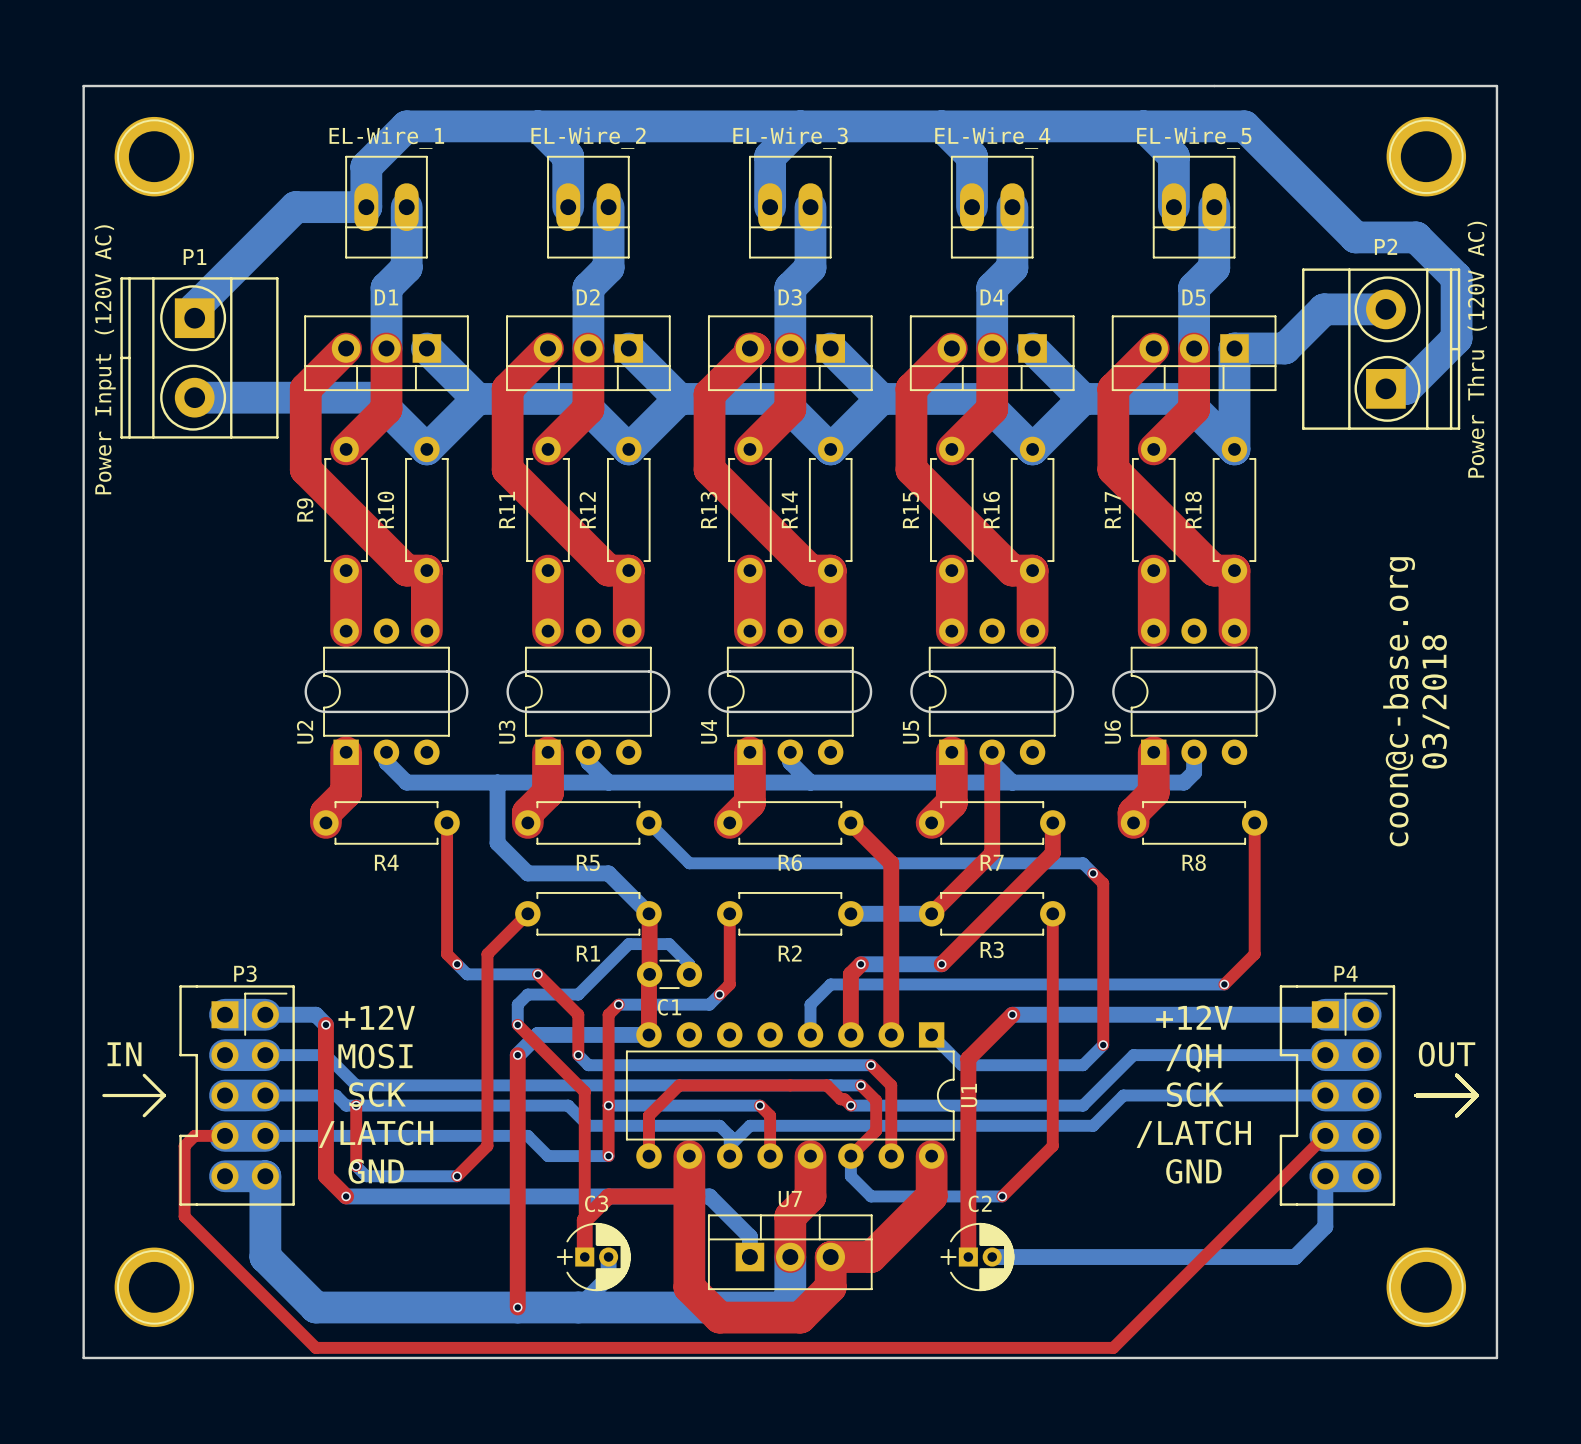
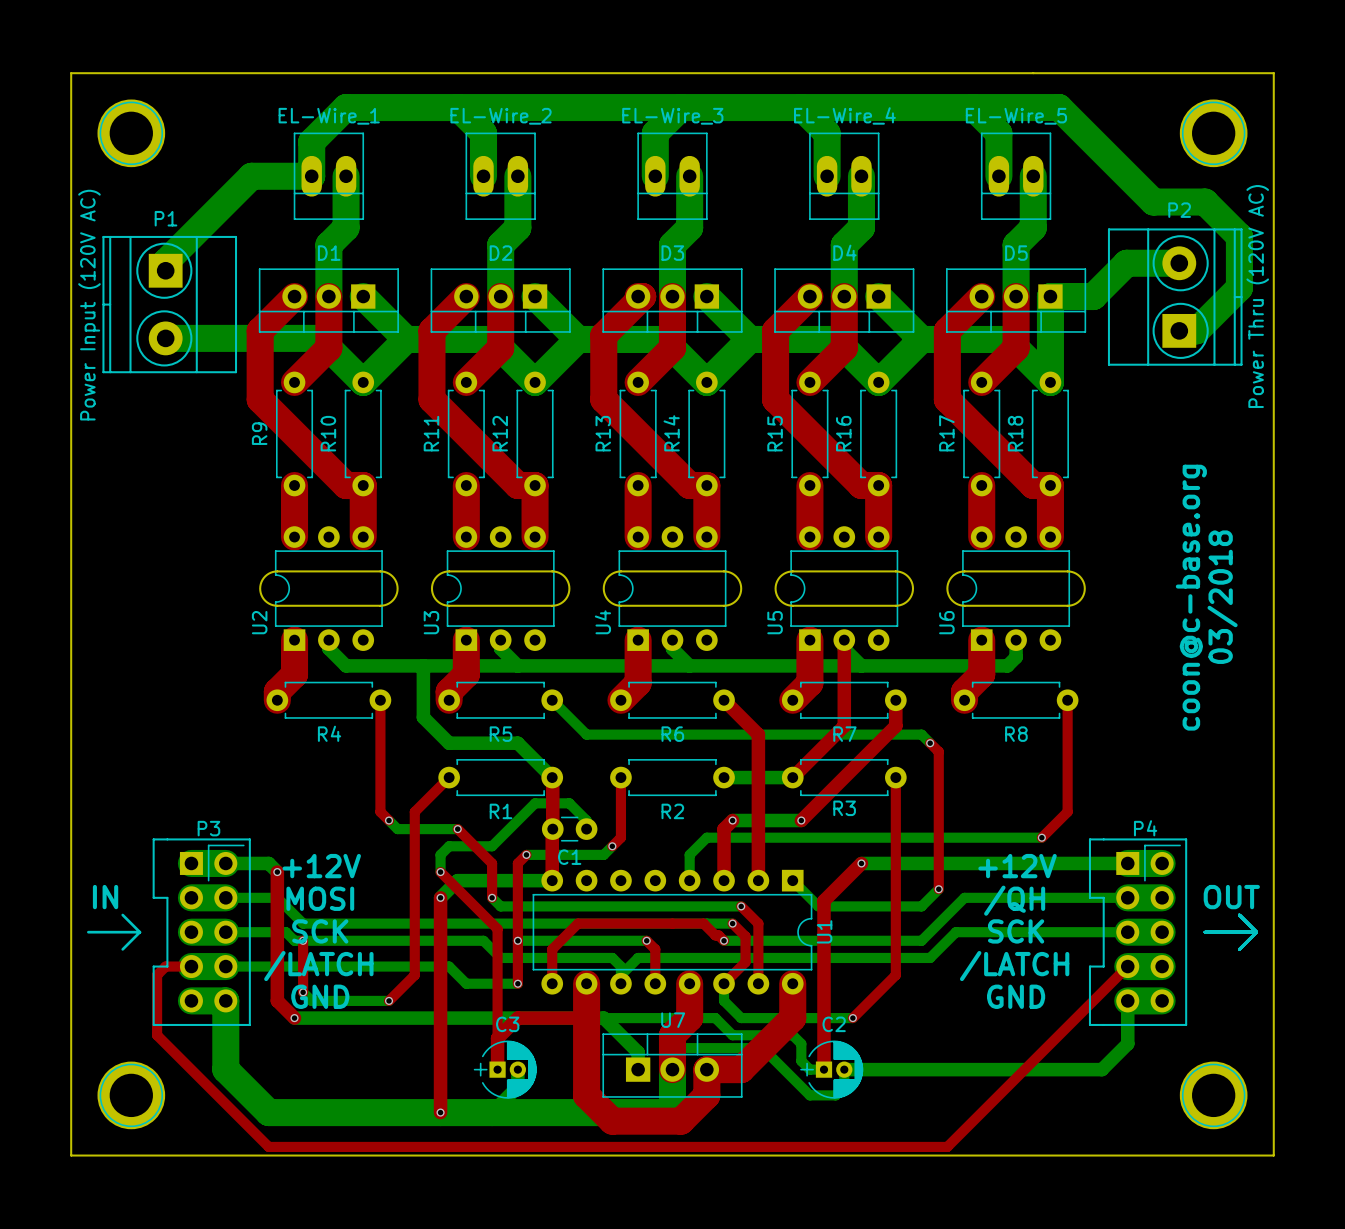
bottom track: none -> (603, 1018) (715, 1018) (732, 1035) (792, 1035) (801, 1043) (801, 1061) (809, 1069) (824, 1069)
bottom track: none -> (672, 1069) (672, 1052) (676, 1048) (762, 1048) (809, 1095) (835, 1095) (844, 1086) (844, 1069)

